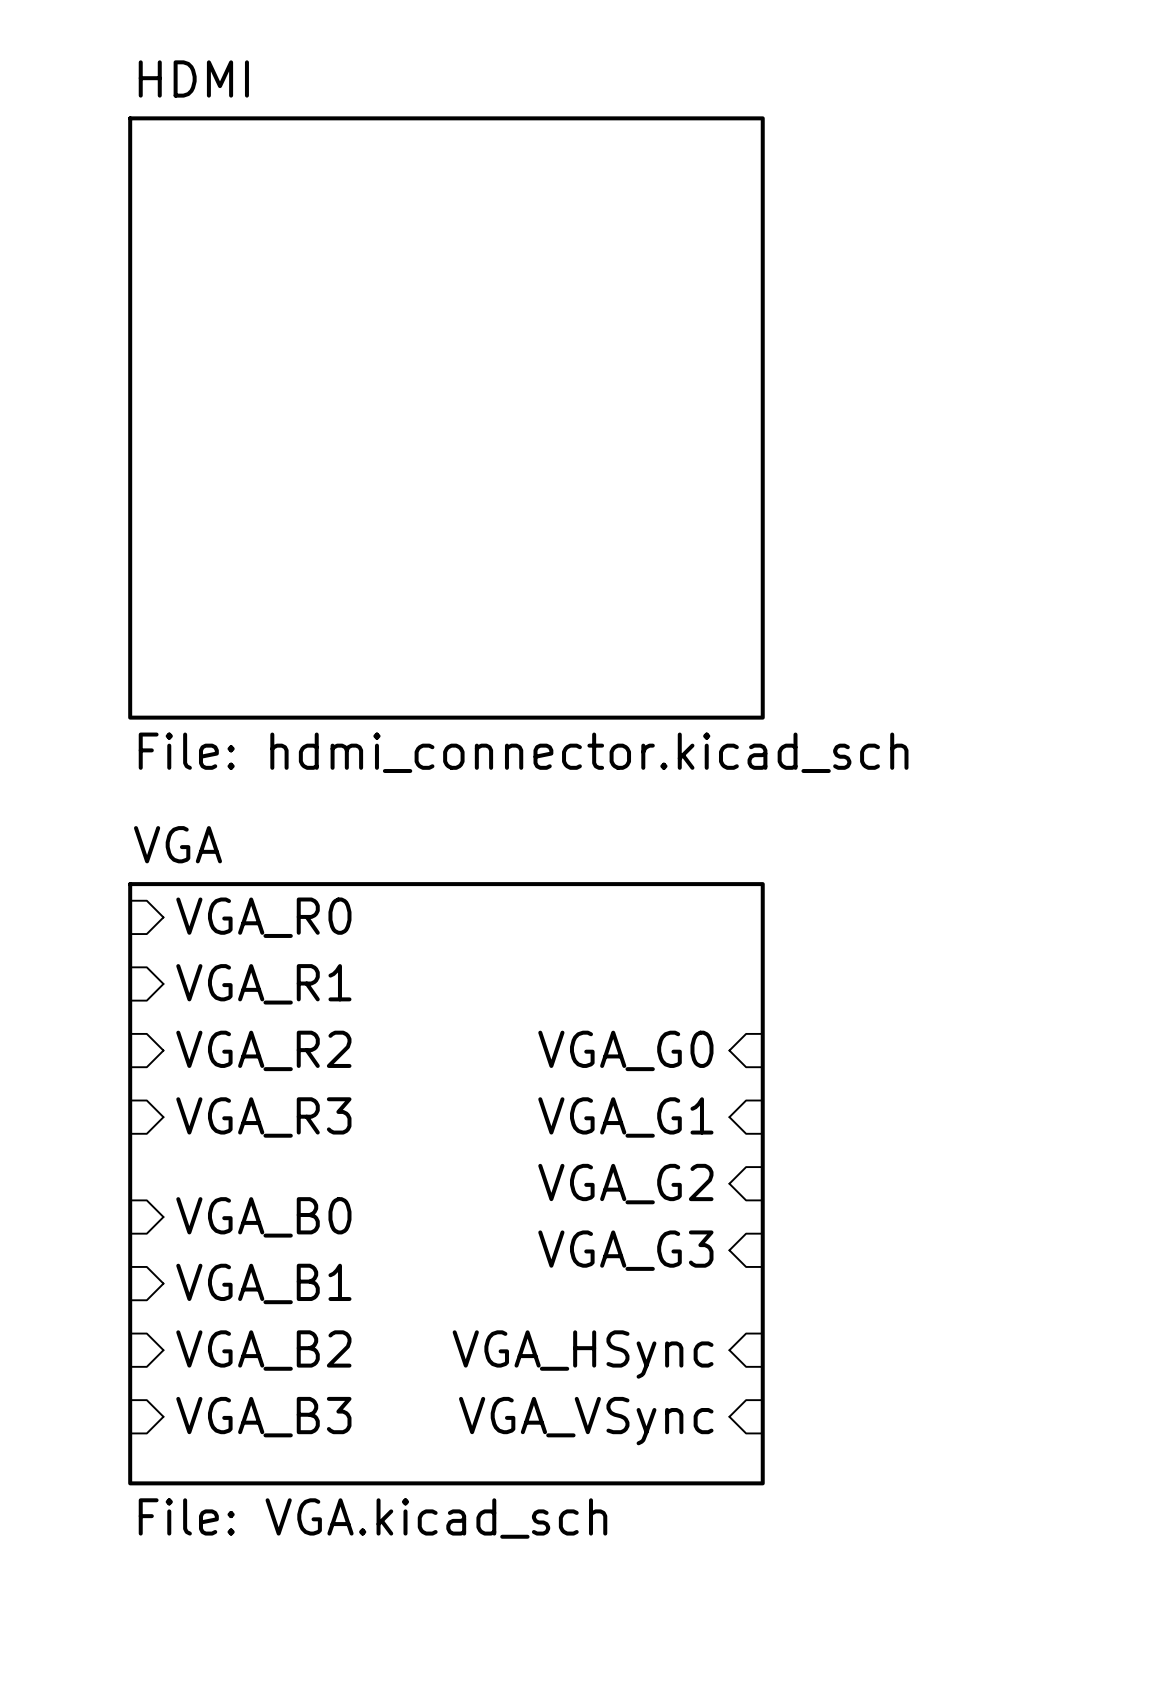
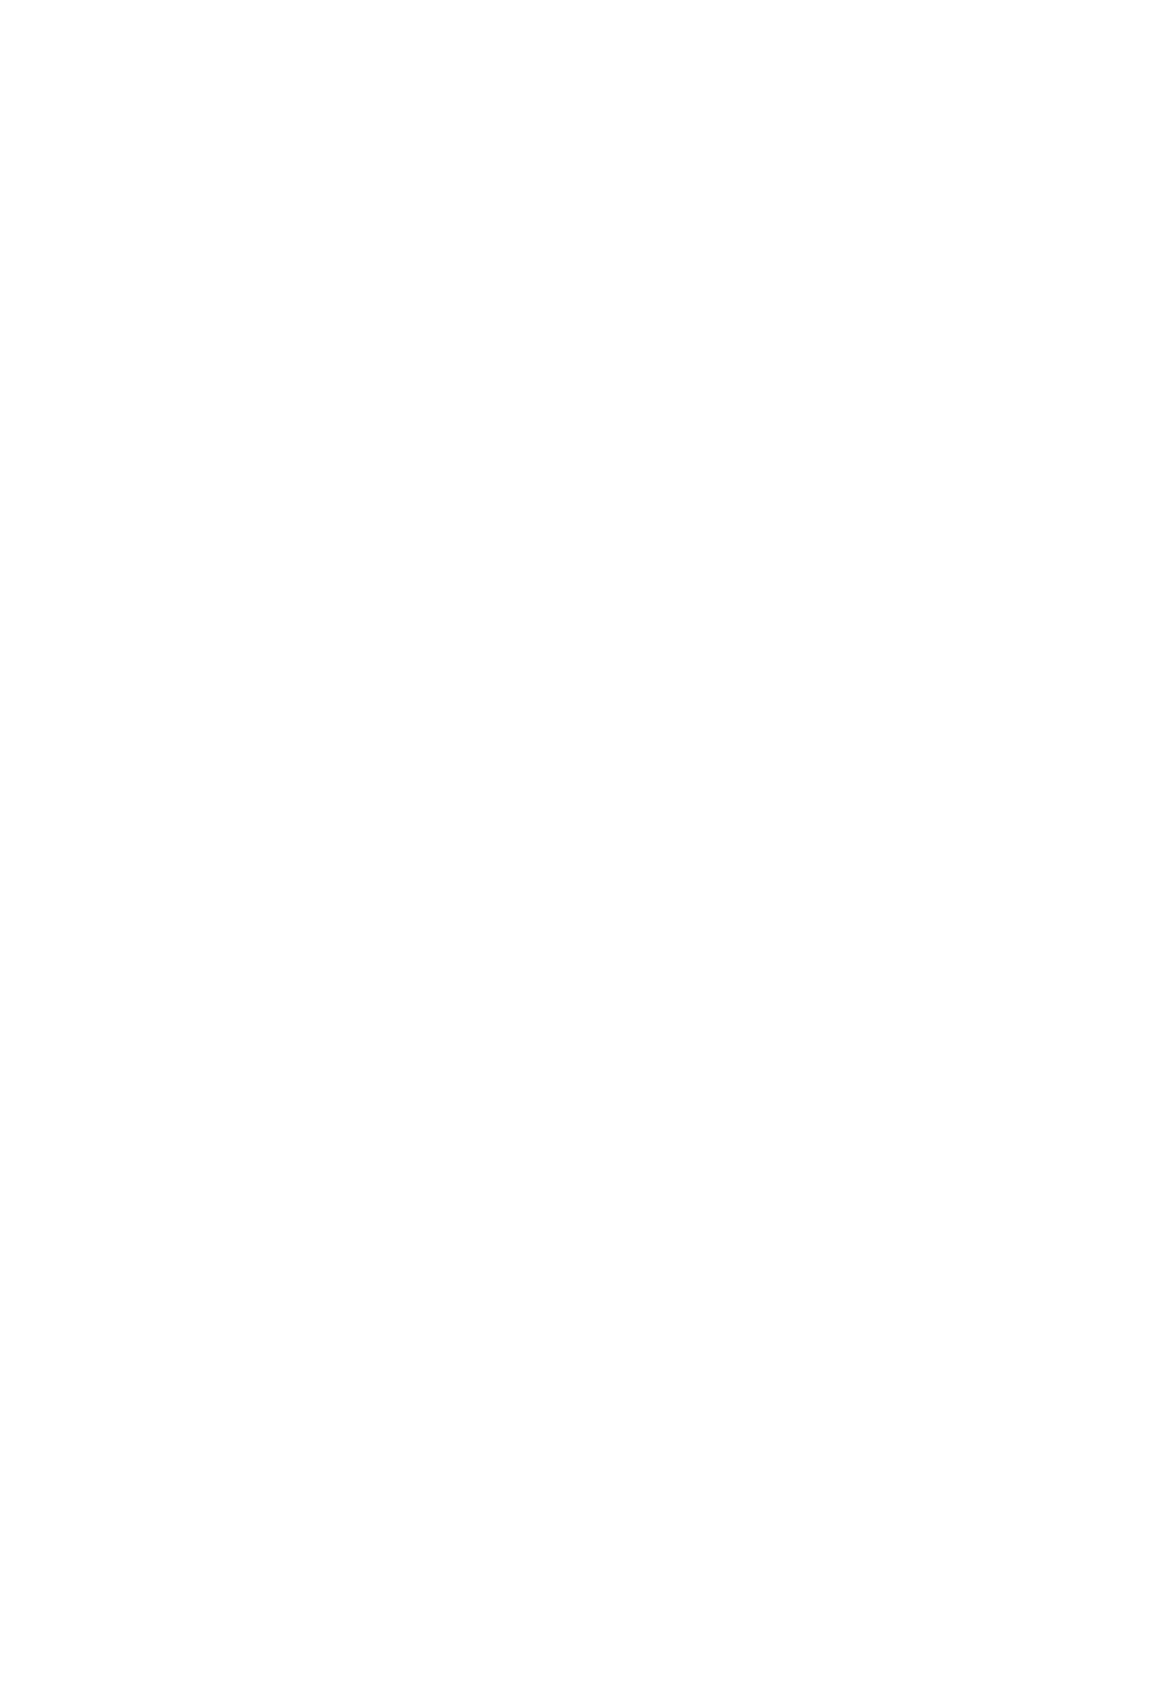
sheet HDMI: File: hdmi_connector.kicad_sch (446, 417) -> none
sheet pin: VGA_R0 (263, 917) -> none
sheet pin: VGA_R1 (263, 984) -> none
sheet pin: VGA_R2 (263, 1050) -> none
sheet pin: VGA_G0 (625, 1050) -> none
sheet pin: VGA_R3 (263, 1117) -> none
sheet pin: VGA_G1 (625, 1117) -> none
sheet VGA: File: VGA.kicad_sch (446, 1183) -> none
sheet pin: VGA_G2 (625, 1184) -> none
sheet pin: VGA_B0 (263, 1217) -> none
sheet pin: VGA_G3 (625, 1250) -> none
sheet pin: VGA_B1 (263, 1283) -> none
sheet pin: VGA_B2 (263, 1350) -> none
sheet pin: VGA_HSync (583, 1354) -> none
sheet pin: VGA_B3 (263, 1417) -> none
sheet pin: VGA_VSync (586, 1421) -> none

